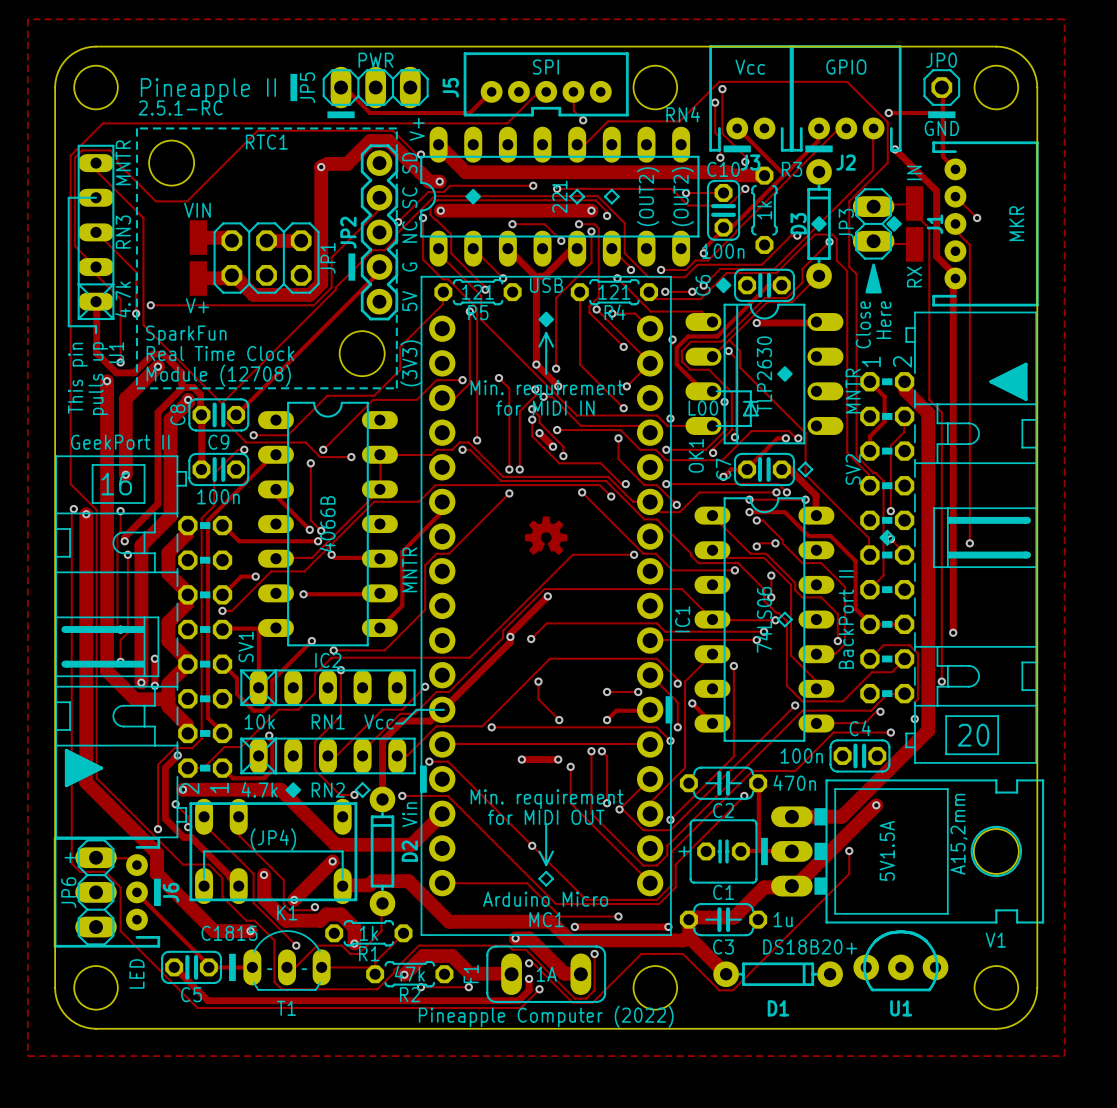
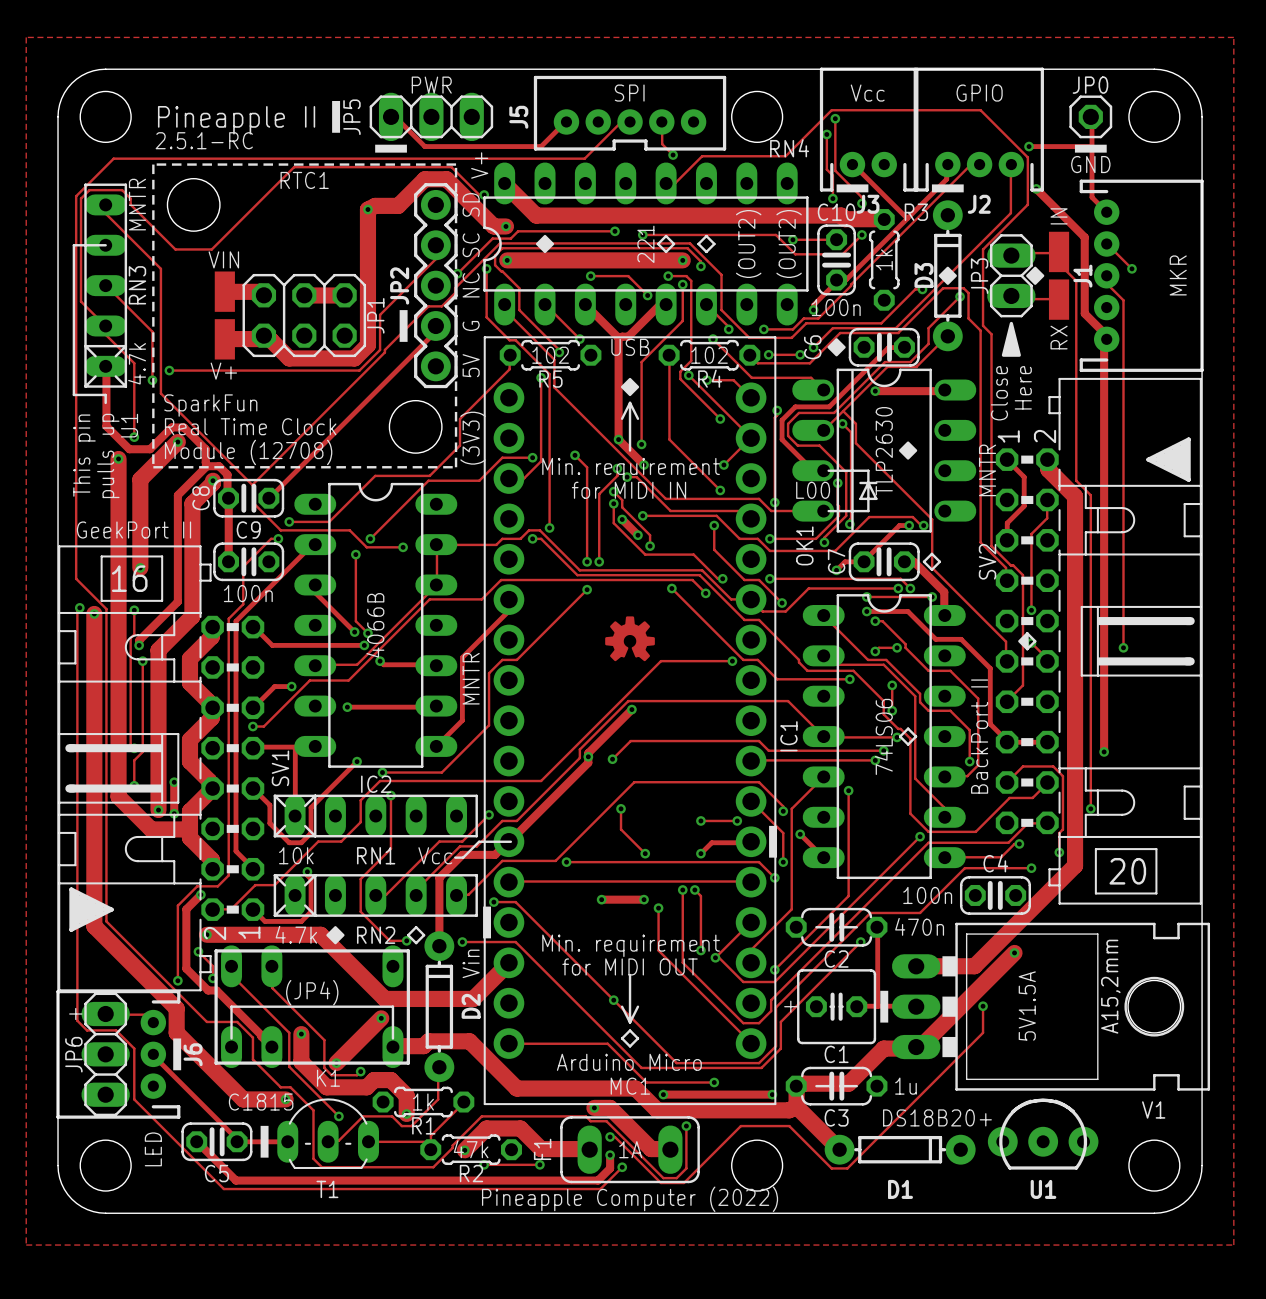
text: 121 (477, 292) -> 102 (550, 355)
text: 121 (614, 292) -> 102 (709, 355)

